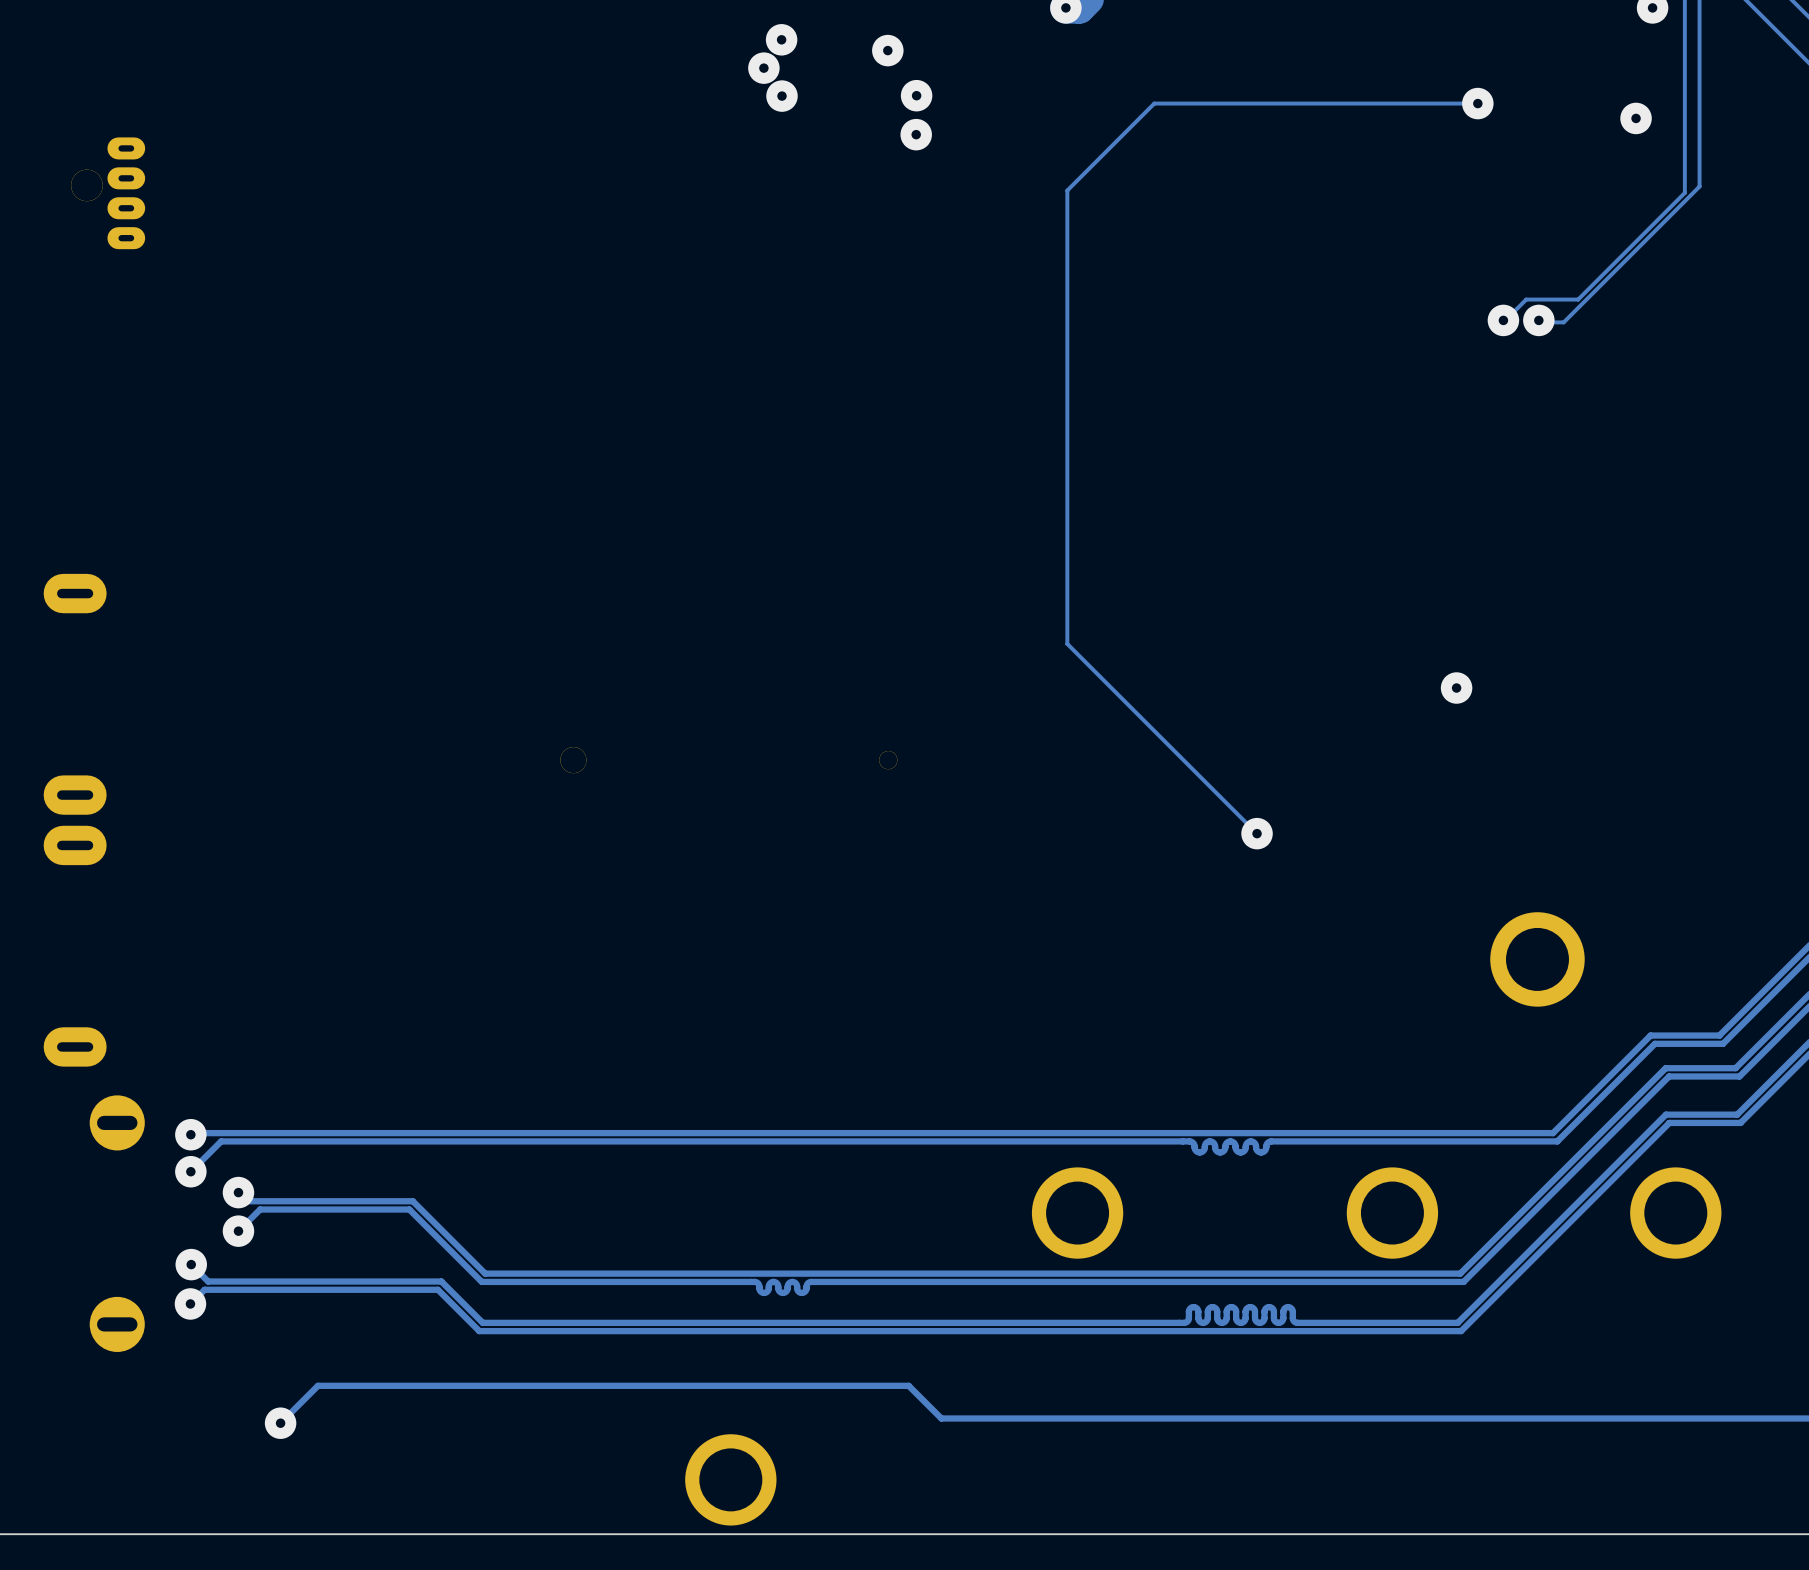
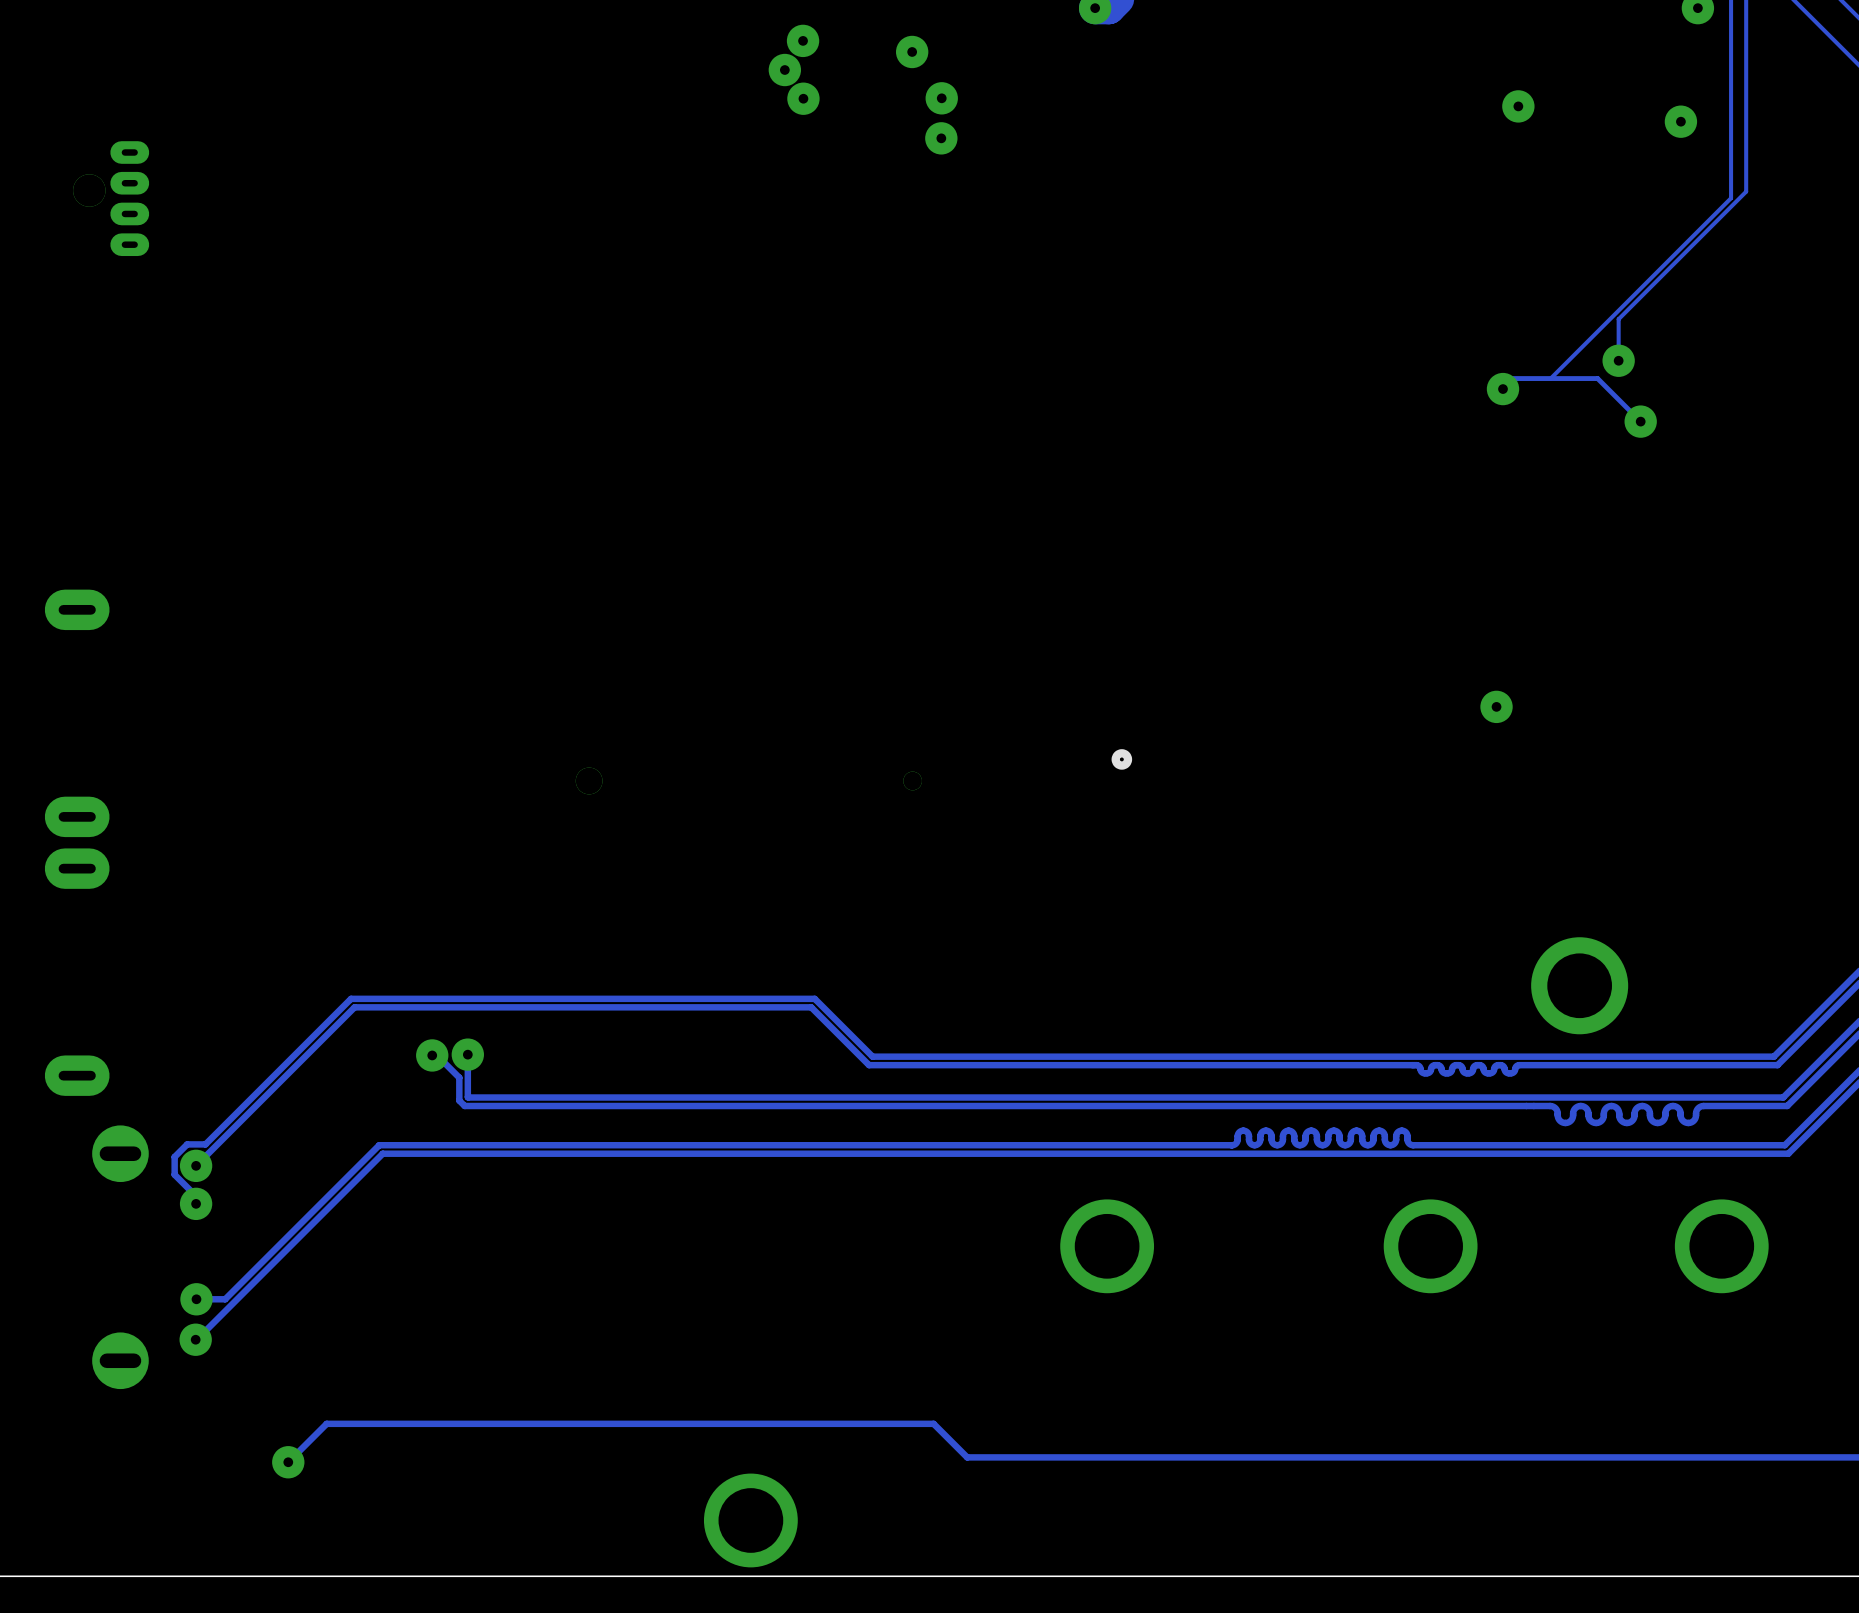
track: (1477, 103) (1154, 103) (1067, 190) (1067, 643) (1257, 833) -> none
track: (1578, 299) (1526, 299) (1505, 320) -> (1621, 307) (1550, 378) (1513, 378)
track: (1575, 310) (1563, 322) (1540, 322) (1538, 320) -> (1618, 319) (1618, 360) (1625, 354)
via: (1503, 320) -> none
via: (1538, 320) -> none
via: none -> (1618, 360)
track: none -> (1513, 378) (1597, 378) (1640, 421)
via: none -> (1503, 389)
via: none -> (1640, 421)
part: none -> (1121, 759)
via: (1257, 833) -> none
via: none -> (467, 1054)
via: none -> (432, 1055)
track: (1726, 1028) (1719, 1035) -> (1773, 1056) (872, 1056) (814, 998) (351, 998) (205, 1144) (187, 1144) (174, 1156) (174, 1174) (196, 1196) (196, 1203) (196, 1193)
track: (1719, 1035) (1650, 1035) (1553, 1133) (192, 1133) -> (1777, 1065) (1519, 1065) (1511, 1073) (1506, 1072) (1503, 1066) (1500, 1065) (1495, 1066) (1493, 1071) (1490, 1073) (1485, 1072) (1482, 1066) (1479, 1065) (1474, 1066) (1472, 1071) (1469, 1073) (1464, 1072) (1461, 1066) (1458, 1065) (1453, 1066) (1451, 1071) (1448, 1073) (1443, 1072) (1440, 1066) (1437, 1065) (1432, 1066) (1430, 1071) (1427, 1073) (1422, 1072) (1419, 1066) (1416, 1065) (869, 1065) (811, 1007) (354, 1007) (197, 1164)
track: (1730, 1036) (1723, 1043) (1654, 1043) (1557, 1141) (1271, 1141) (1267, 1142) (1265, 1150) (1261, 1152) (1257, 1150) (1255, 1143) (1250, 1141) (1246, 1143) (1244, 1150) (1240, 1152) (1237, 1150) (1234, 1143) (1230, 1141) (1226, 1143) (1223, 1150) (1220, 1152) (1215, 1150) (1213, 1142) (1209, 1141) (1206, 1142) (1204, 1150) (1199, 1152) (1196, 1150) (1193, 1143) (1189, 1141) (221, 1141) (190, 1171) -> none
track: (1665, 1068) (1460, 1273) (485, 1273) (412, 1201) (247, 1201) (238, 1192) -> (1711, 1097) (468, 1097) (467, 1054)
track: (1669, 1076) (1463, 1281) (811, 1281) (807, 1284) (805, 1291) (801, 1292) (798, 1291) (796, 1284) (792, 1281) (788, 1284) (786, 1291) (782, 1292) (778, 1290) (777, 1283) (773, 1281) (769, 1284) (767, 1291) (764, 1292) (760, 1291) (758, 1284) (754, 1281) (481, 1281) (409, 1209) (260, 1209) (238, 1231) -> (1714, 1106) (1699, 1107) (1694, 1120) (1688, 1122) (1681, 1119) (1678, 1108) (1672, 1106) (1666, 1109) (1663, 1120) (1657, 1122) (1651, 1119) (1647, 1108) (1642, 1106) (1636, 1108) (1633, 1119) (1626, 1122) (1621, 1120) (1618, 1109) (1611, 1106) (1605, 1109) (1601, 1120) (1596, 1122) (1590, 1120) (1587, 1109) (1580, 1106) (1575, 1108) (1571, 1119) (1565, 1122) (1558, 1119) (1555, 1108) (1550, 1106) (464, 1106) (459, 1100) (459, 1077) (437, 1055) (432, 1055)
track: (1665, 1114) (1457, 1322) (1296, 1322) (1293, 1319) (1292, 1309) (1288, 1307) (1283, 1310) (1282, 1320) (1278, 1322) (1274, 1320) (1273, 1310) (1269, 1307) (1265, 1309) (1264, 1319) (1259, 1322) (1255, 1319) (1254, 1309) (1250, 1307) (1245, 1310) (1244, 1320) (1240, 1322) (1236, 1320) (1235, 1310) (1231, 1307) (1227, 1309) (1226, 1319) (1221, 1322) (1217, 1320) (1216, 1310) (1212, 1307) (1208, 1310) (1207, 1320) (1203, 1322) (1198, 1320) (1197, 1310) (1193, 1307) (1189, 1310) (1188, 1320) (1184, 1322) (482, 1322) (441, 1281) (208, 1281) (191, 1264) -> (1711, 1145) (1413, 1145) (1408, 1142) (1406, 1132) (1401, 1130) (1397, 1132) (1395, 1142) (1390, 1145) (1385, 1142) (1383, 1132) (1379, 1130) (1374, 1132) (1372, 1142) (1367, 1145) (1363, 1143) (1361, 1133) (1356, 1130) (1352, 1132) (1350, 1142) (1345, 1145) (1340, 1143) (1338, 1133) (1333, 1130) (1329, 1132) (1327, 1142) (1322, 1145) (1317, 1142) (1315, 1132) (1311, 1130) (1306, 1132) (1304, 1142) (1299, 1145) (1295, 1142) (1293, 1132) (1288, 1130) (1284, 1132) (1282, 1142) (1277, 1145) (1272, 1143) (1270, 1133) (1265, 1130) (1261, 1132) (1259, 1142) (1254, 1145) (1249, 1142) (1247, 1132) (1243, 1130) (1238, 1132) (1236, 1142) (1232, 1145) (379, 1145) (225, 1299) (196, 1299)
track: (1669, 1122) (1461, 1331) (479, 1331) (438, 1289) (204, 1289) (190, 1303) -> (1715, 1153) (382, 1153) (195, 1339)
via: (238, 1192) -> none
via: (238, 1231) -> none

